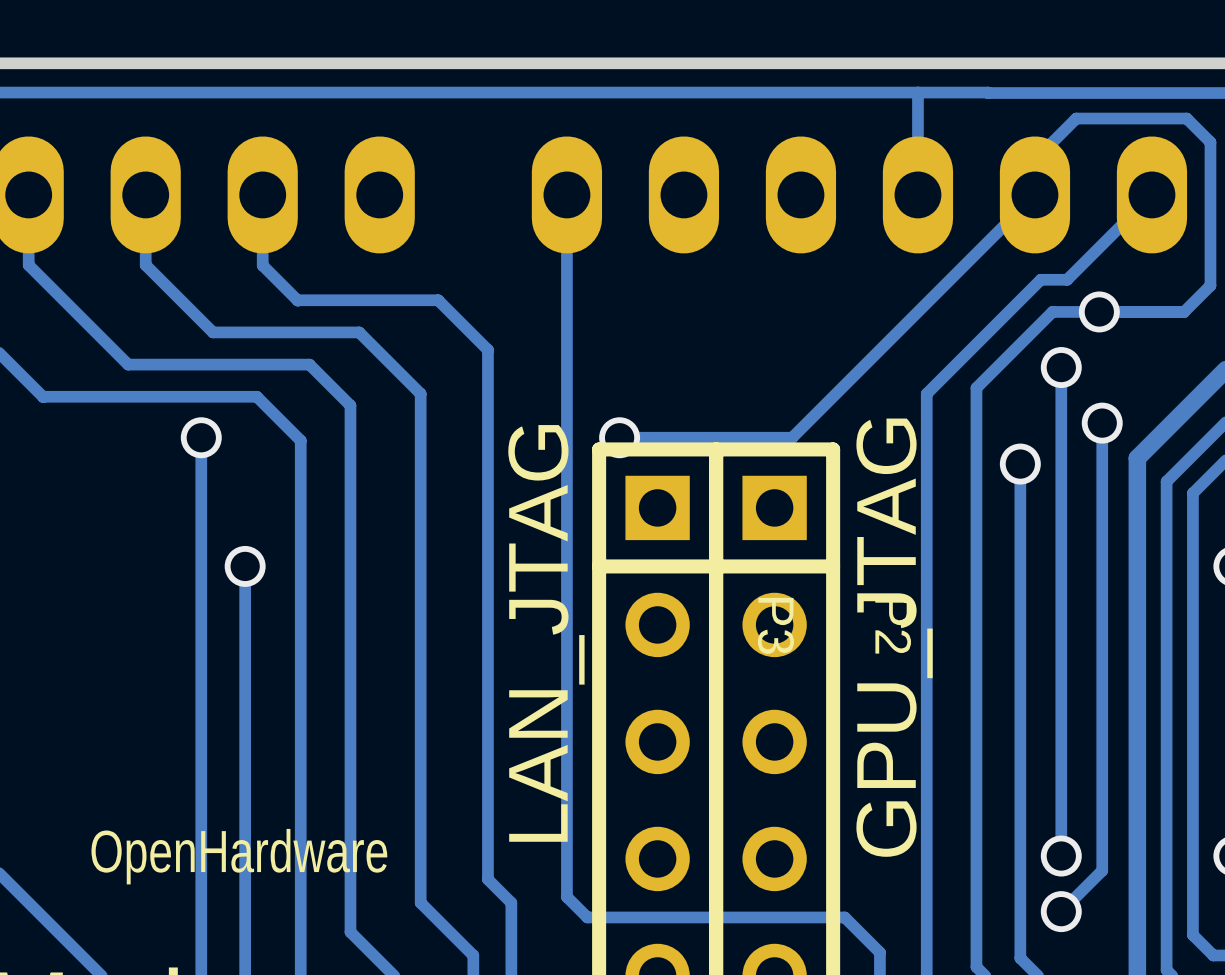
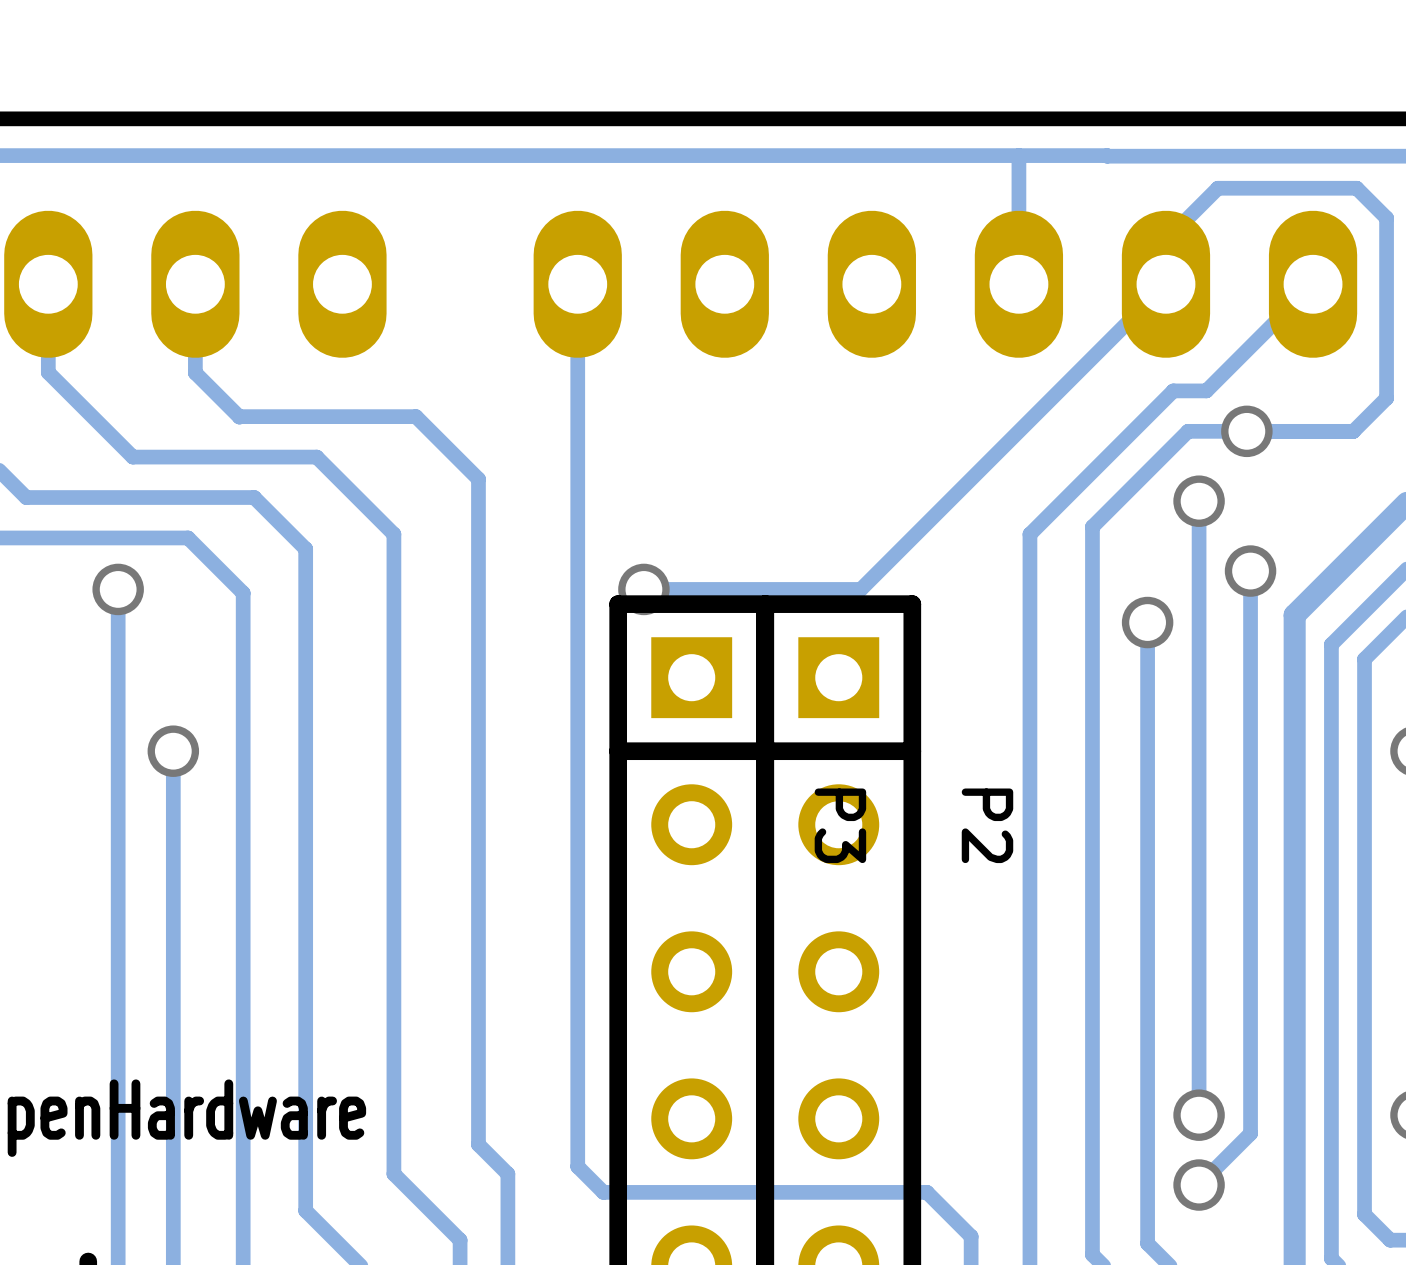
text: LAN_JTAG (546, 633) -> none
text: GPU_JTAG (894, 637) -> none

